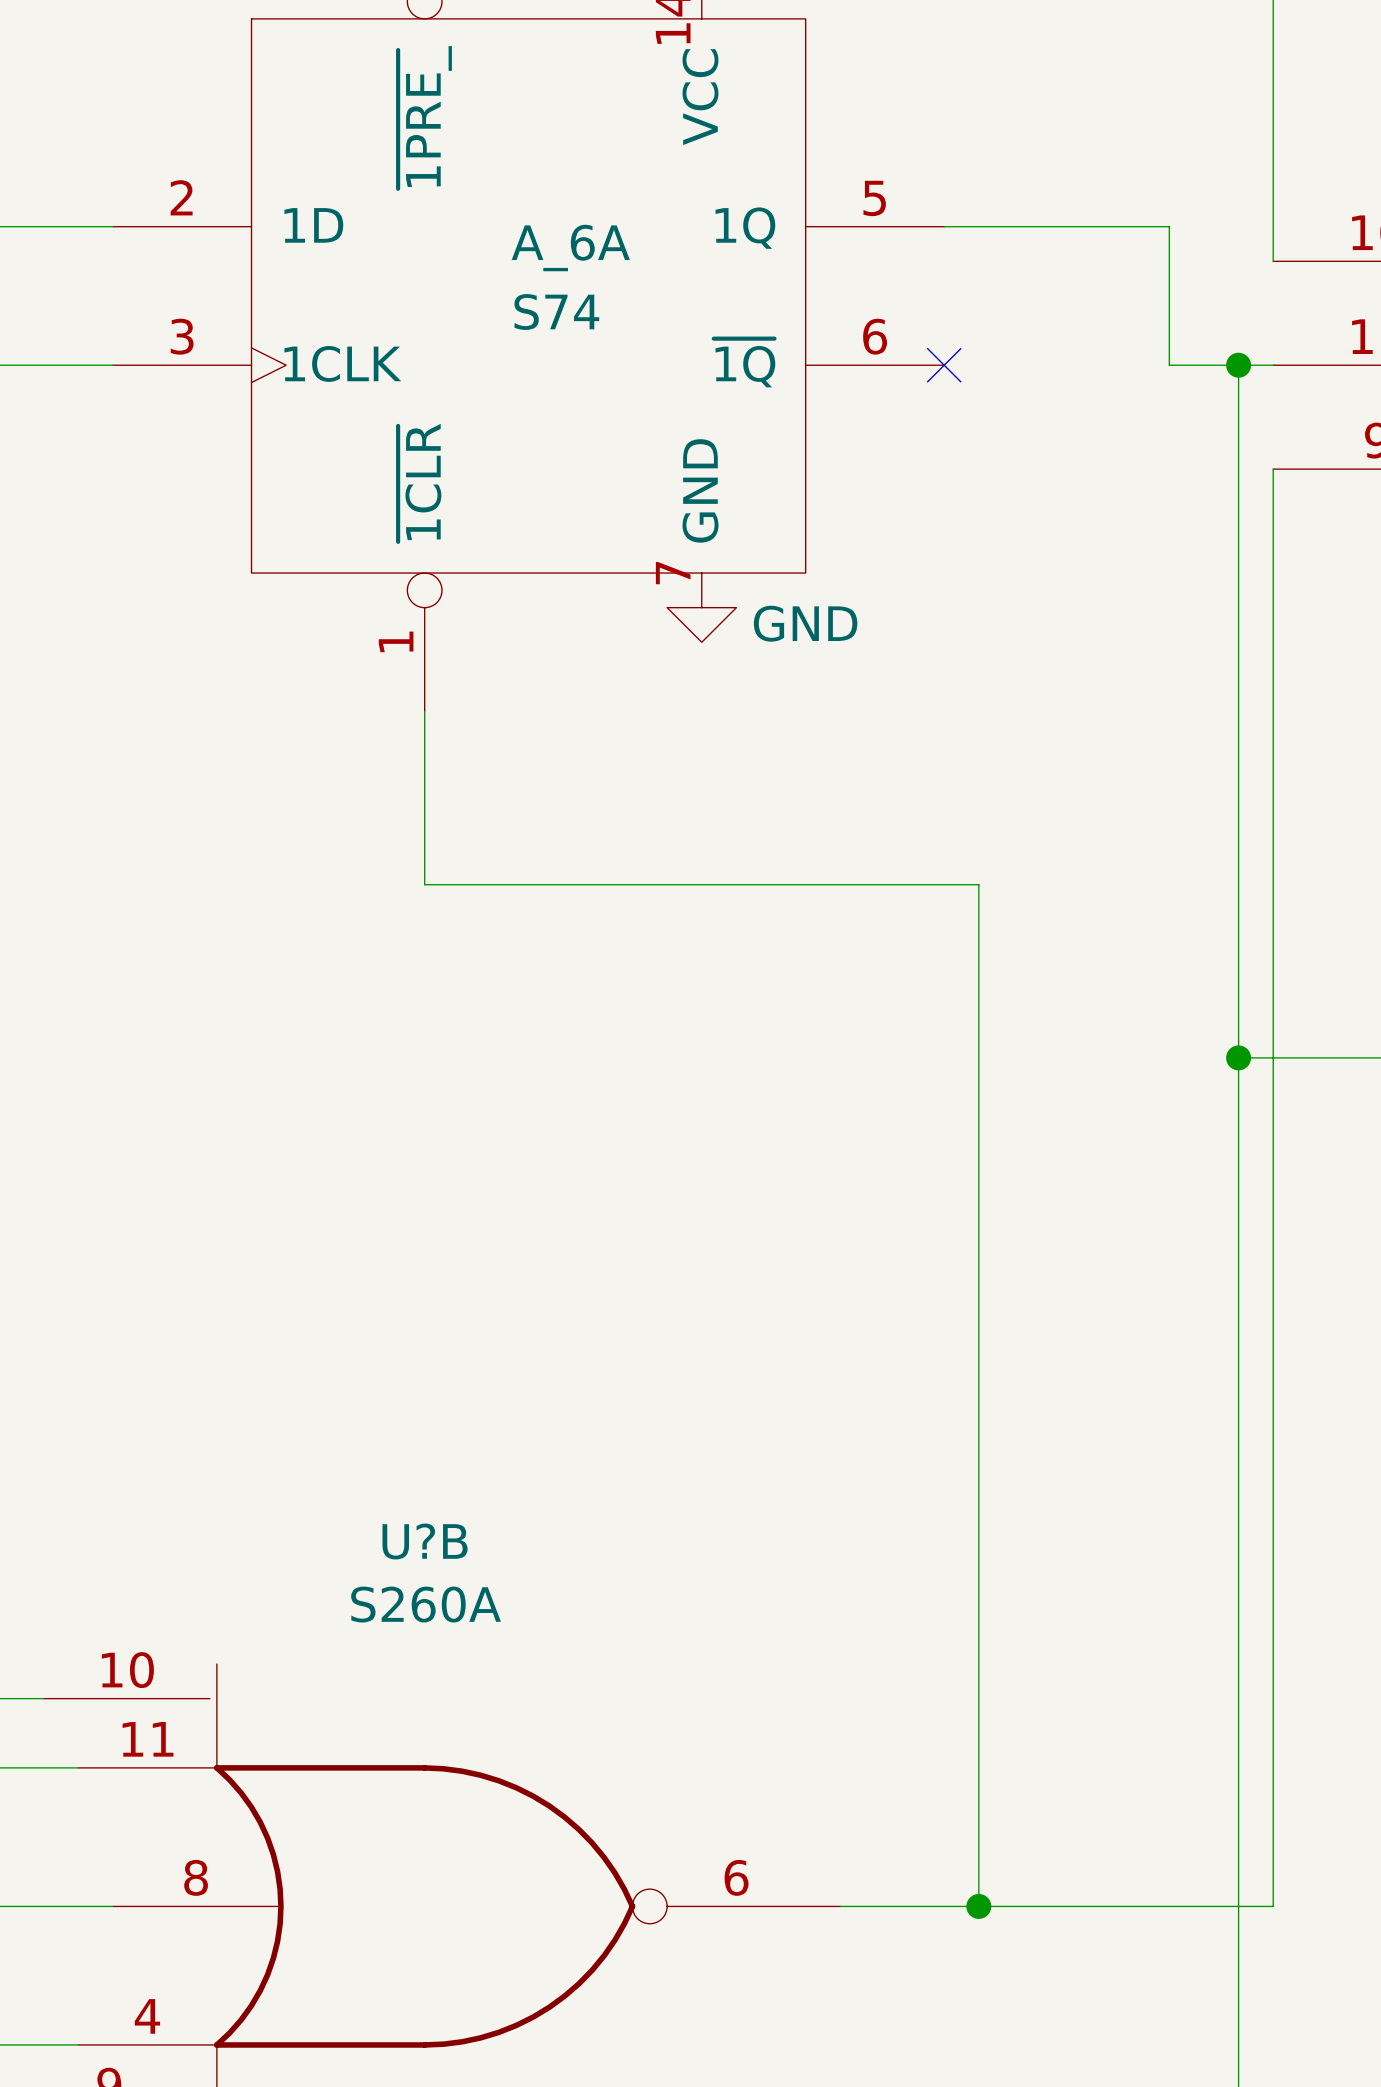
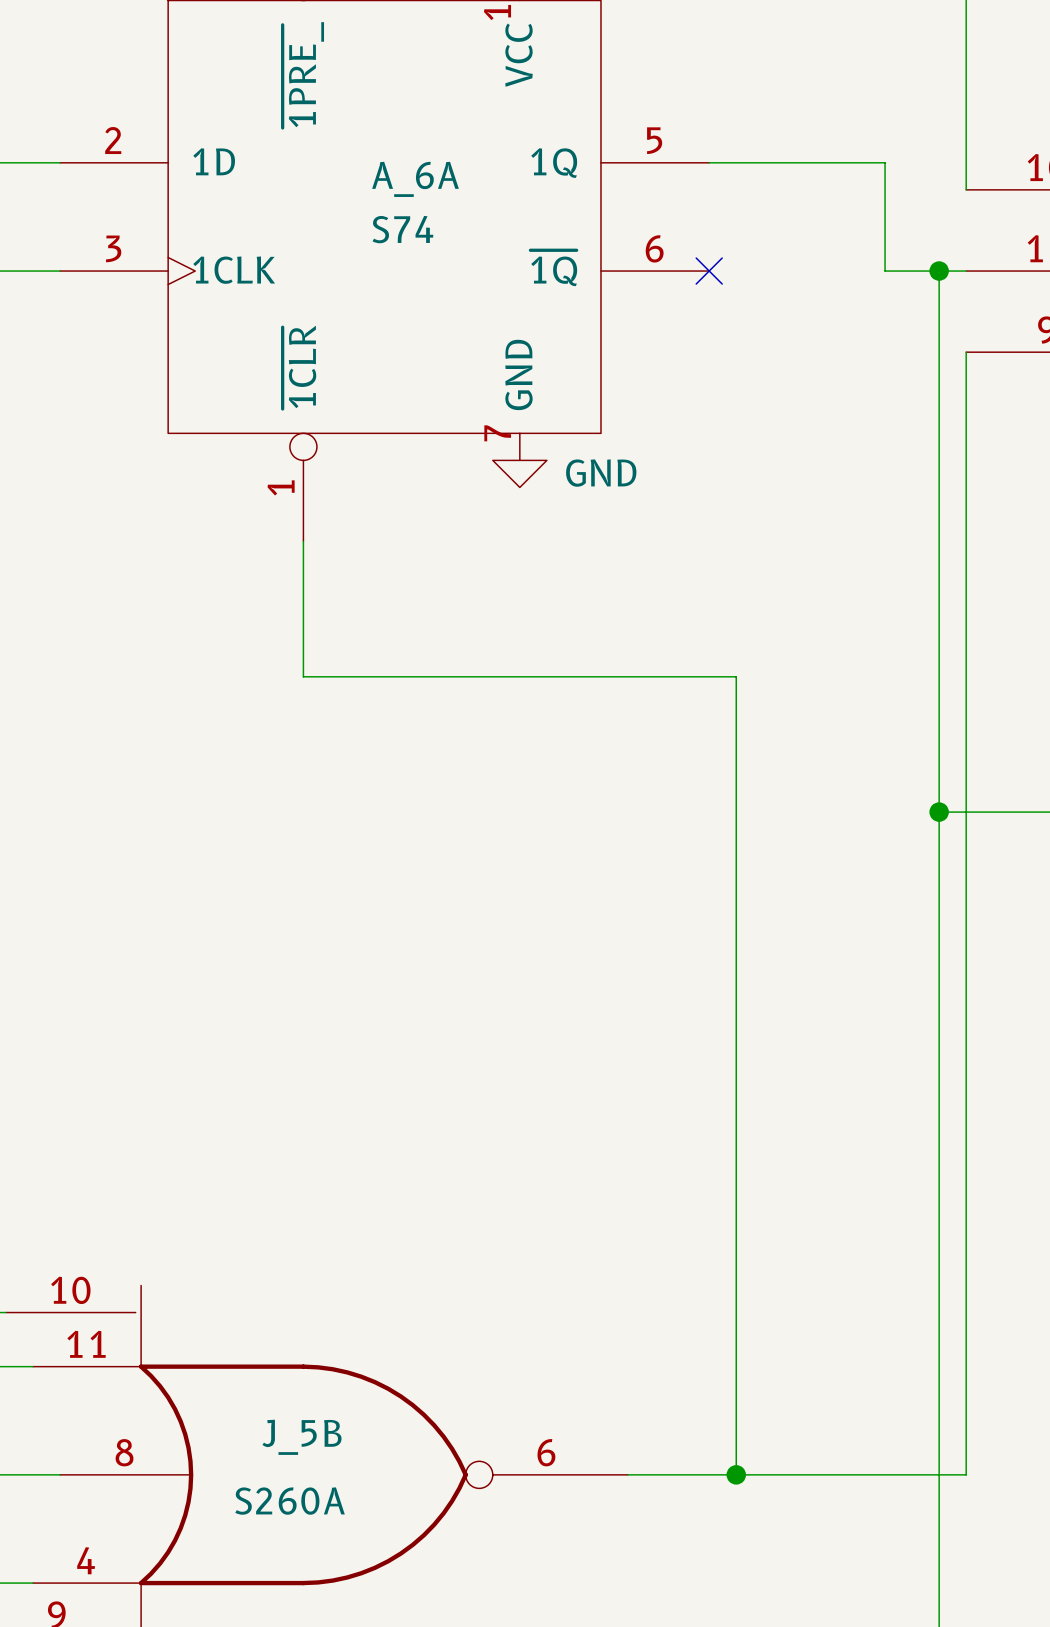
U?B name: U?B (425, 1541) -> J_5B (302, 1437)
U?B value position: S260A (426, 1604) -> S260A (290, 1501)

